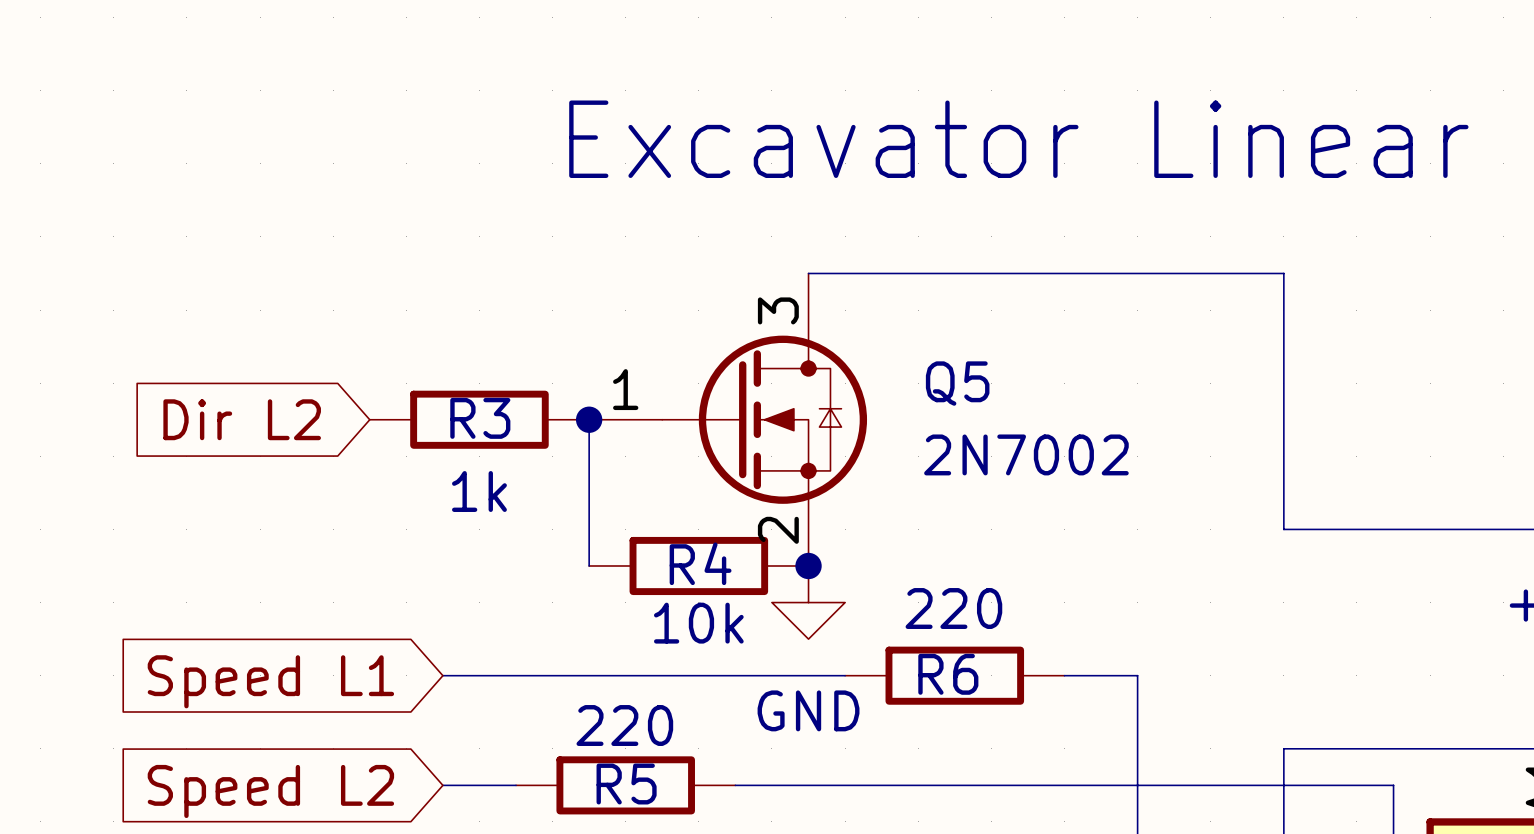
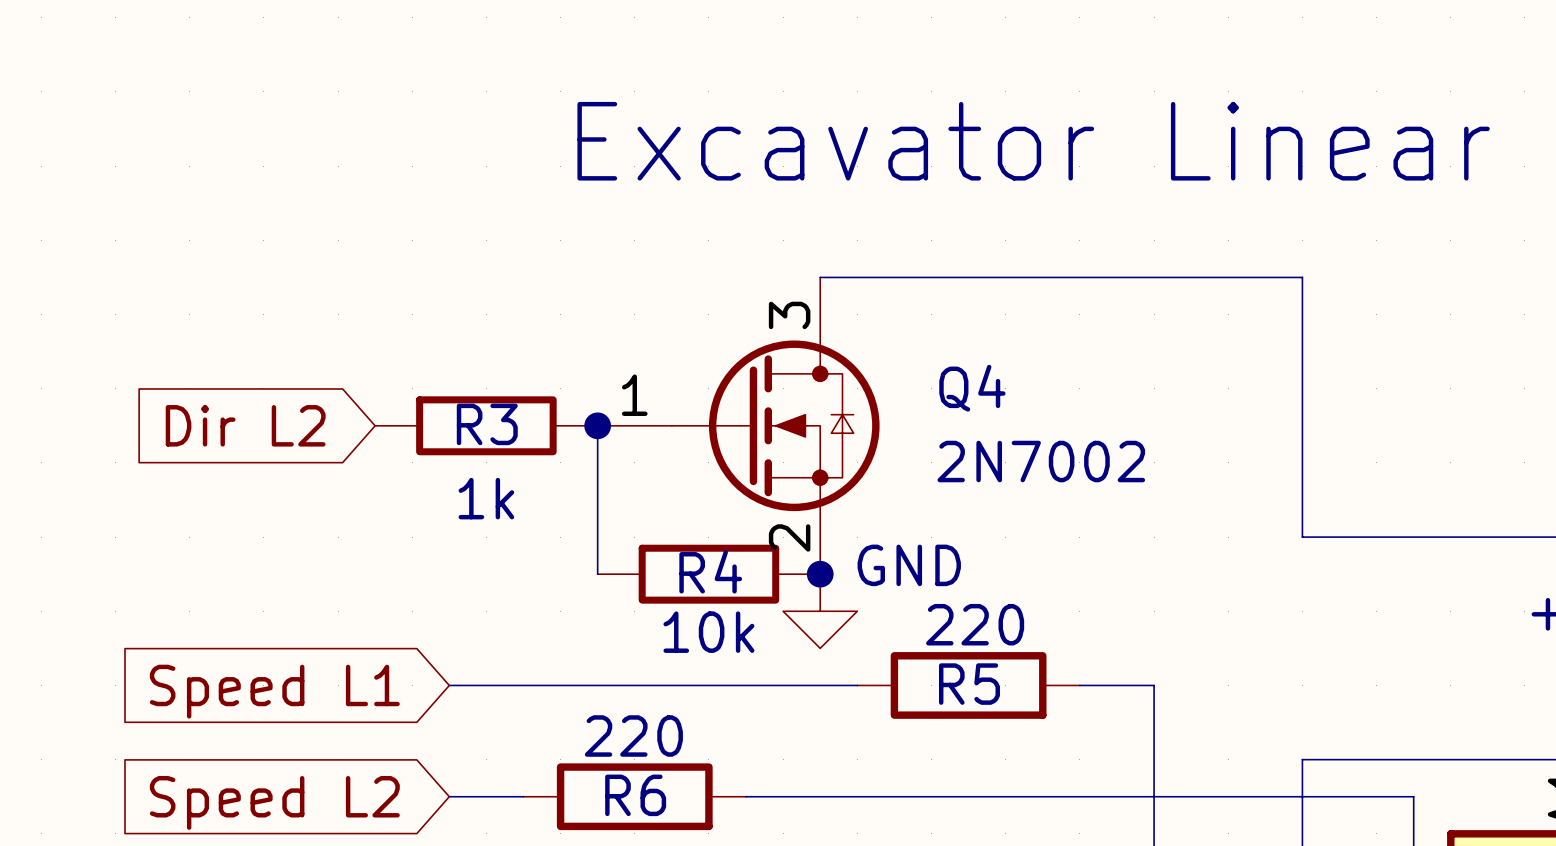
Q5 name: Q5 (957, 383) -> Q4 (972, 388)
R6 symbol: [845, 646, 1065, 705] -> [523, 763, 747, 831]
power symbol text position: GND (808, 710) -> GND (909, 565)
R5 symbol: [516, 756, 736, 815] -> [857, 652, 1080, 719]

